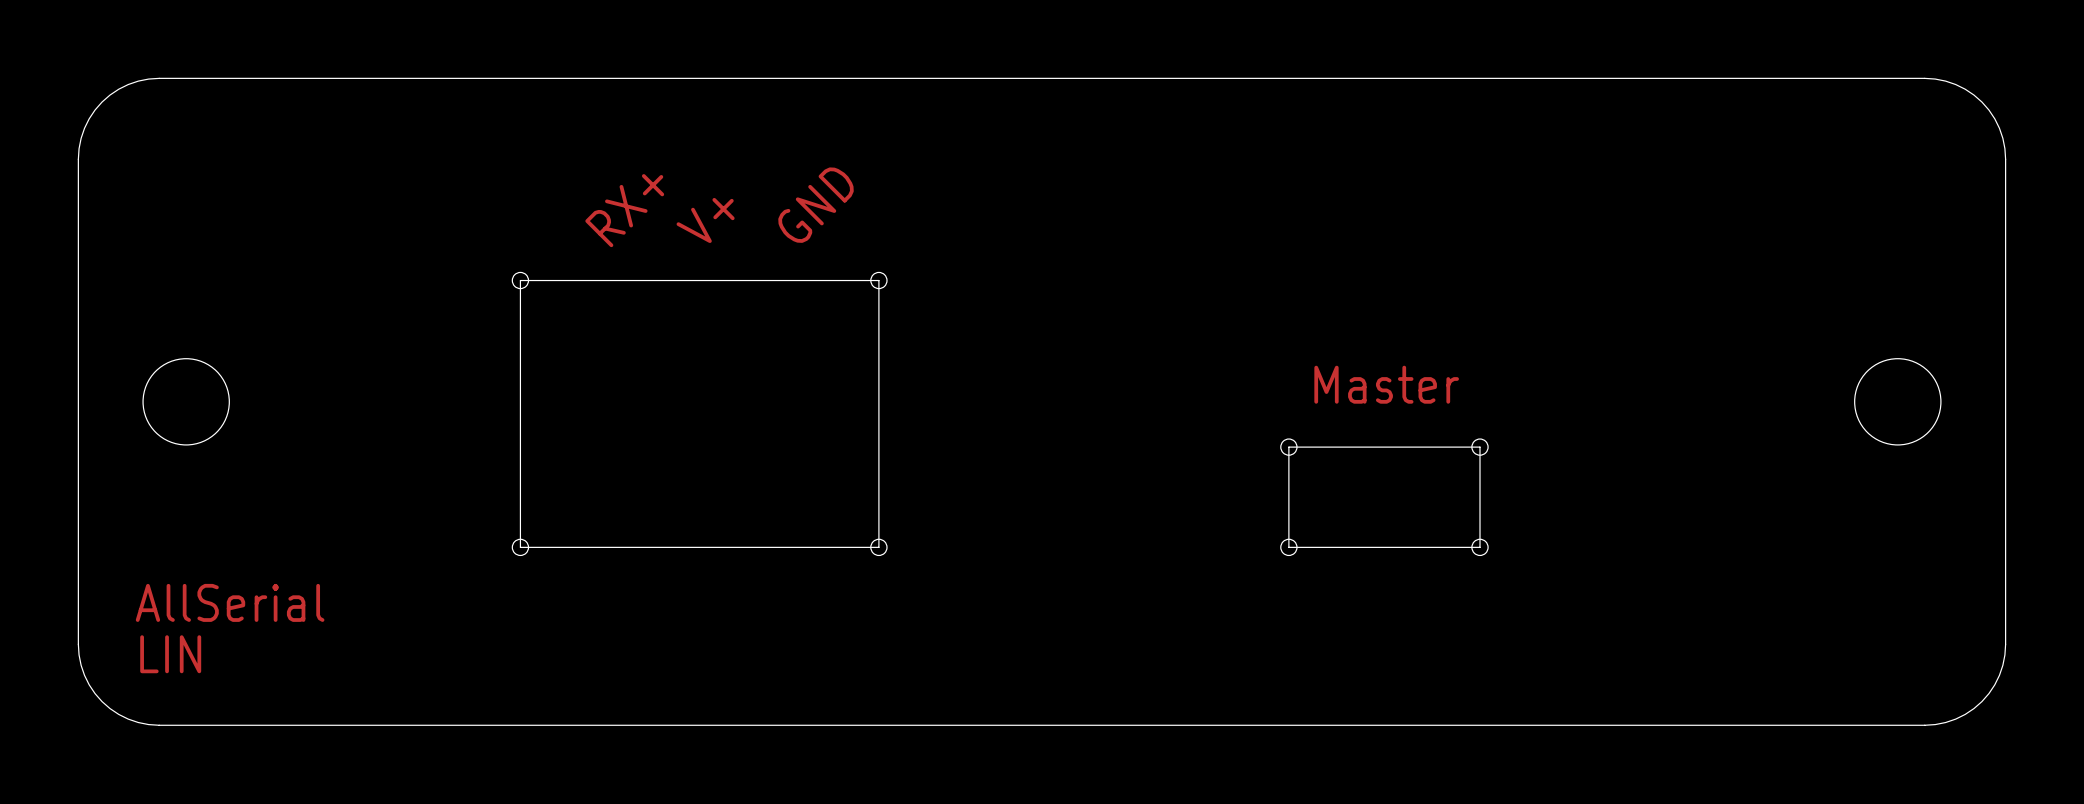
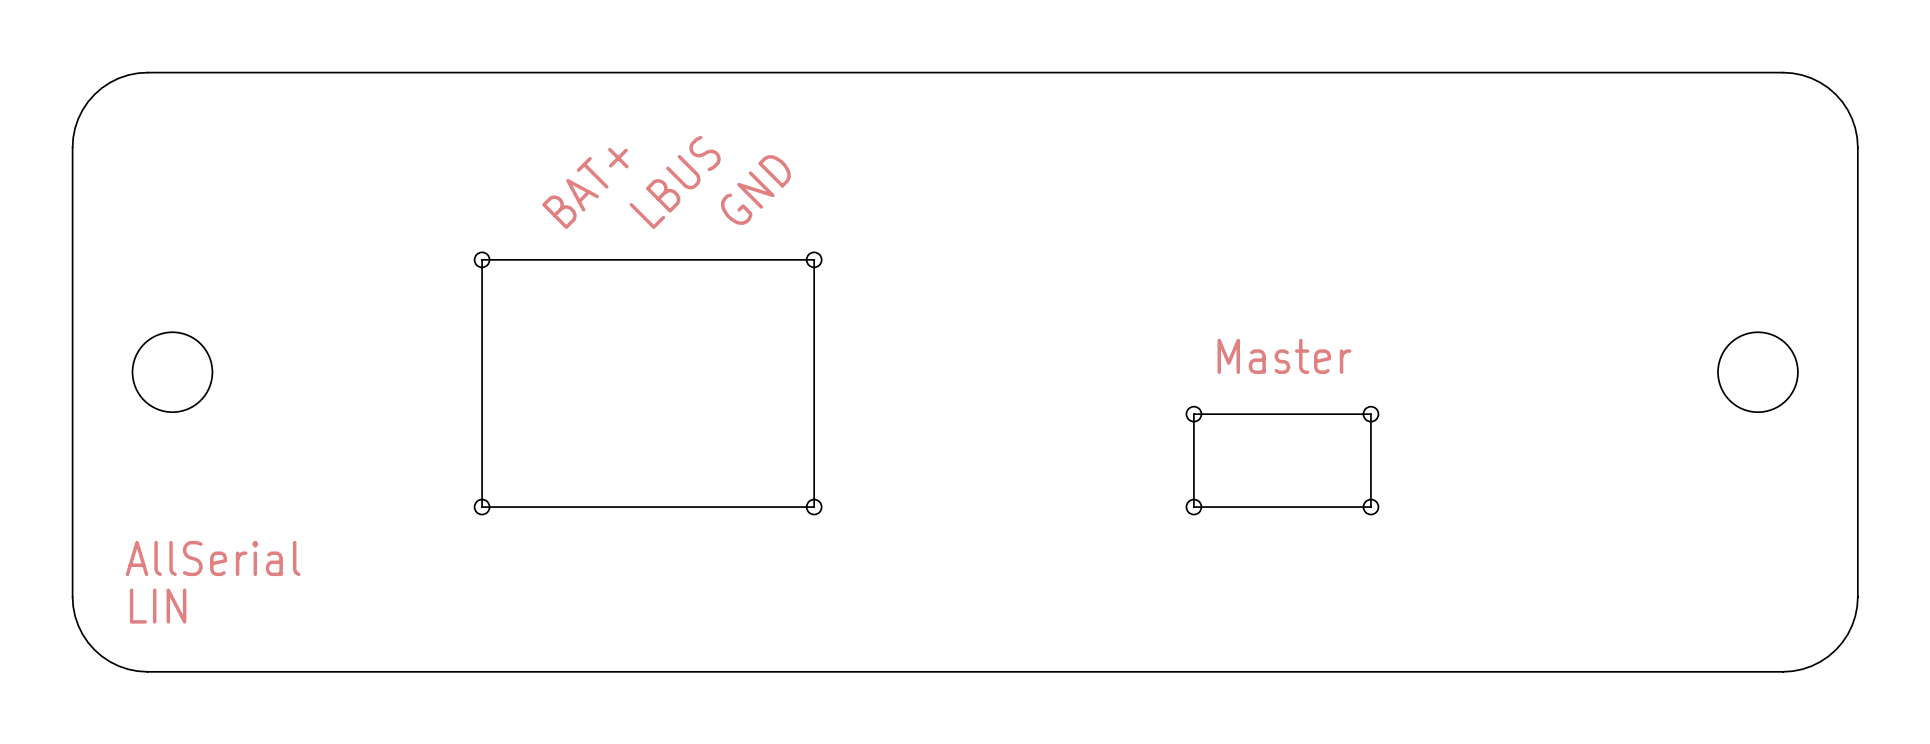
text: RX+ (624, 210) -> BAT+ (585, 188)
text: V+ (705, 220) -> LBUS (675, 182)

